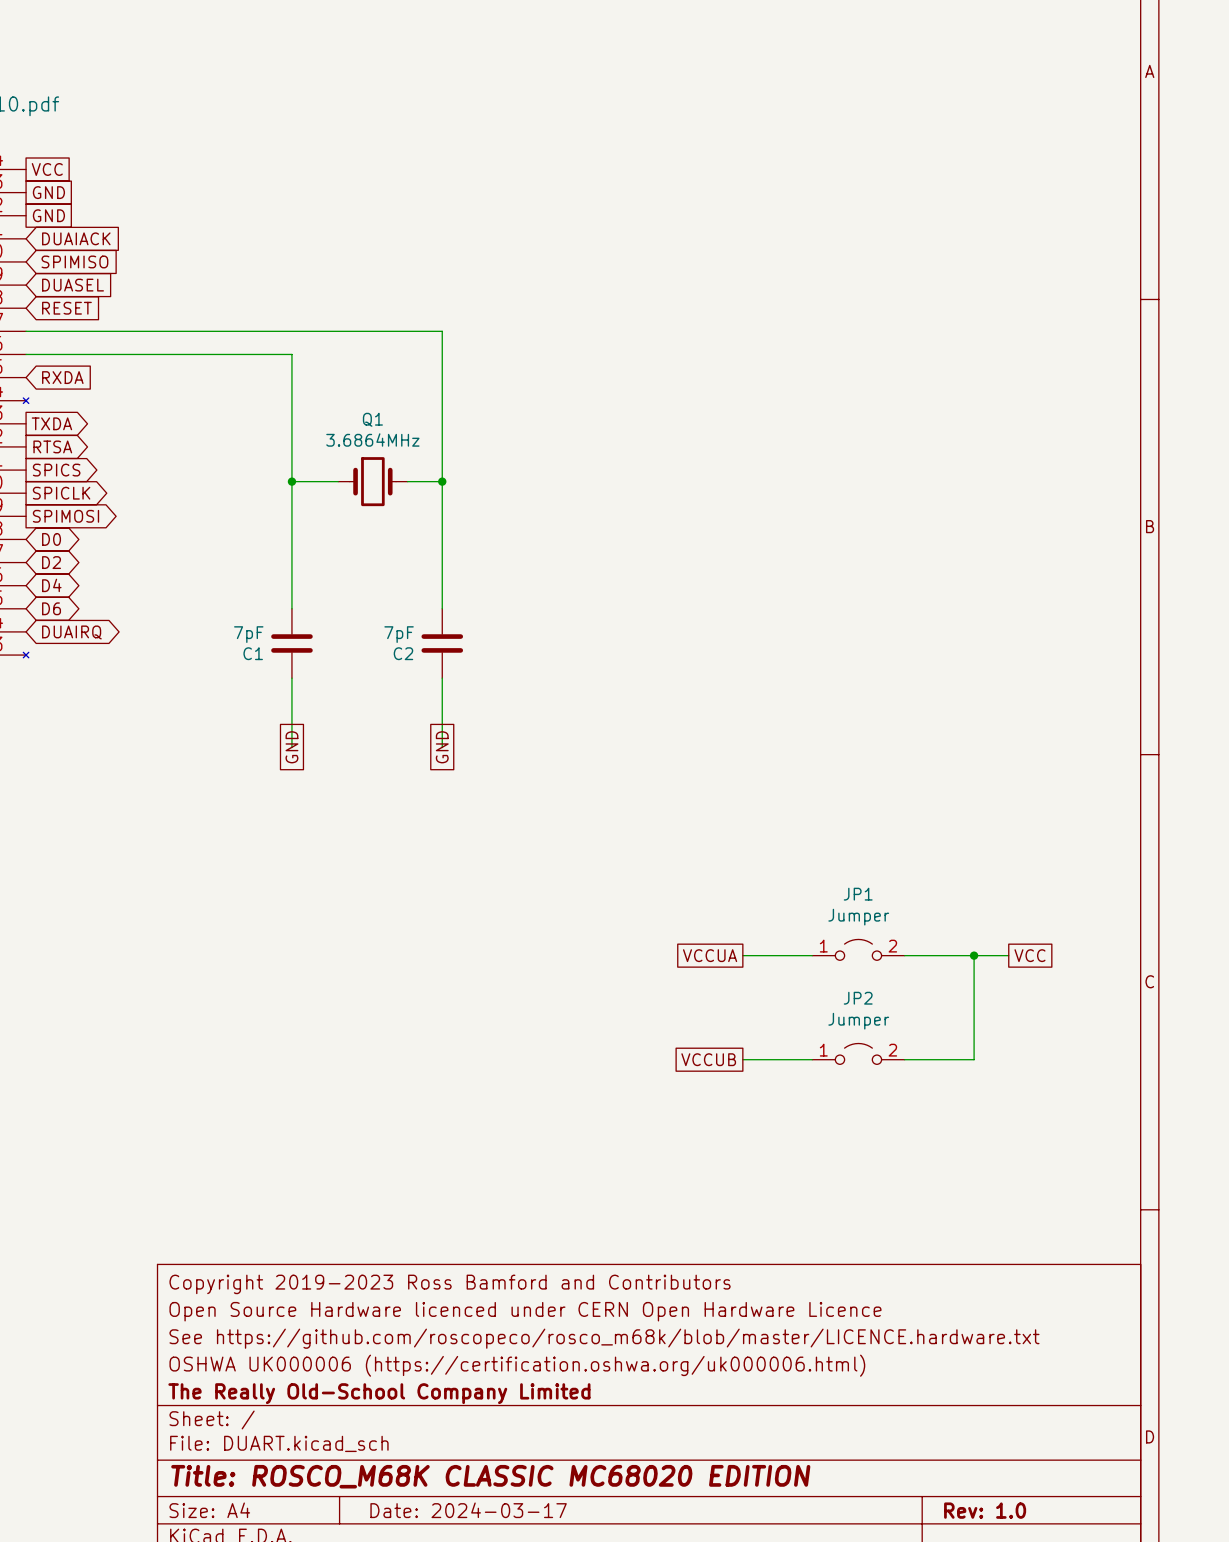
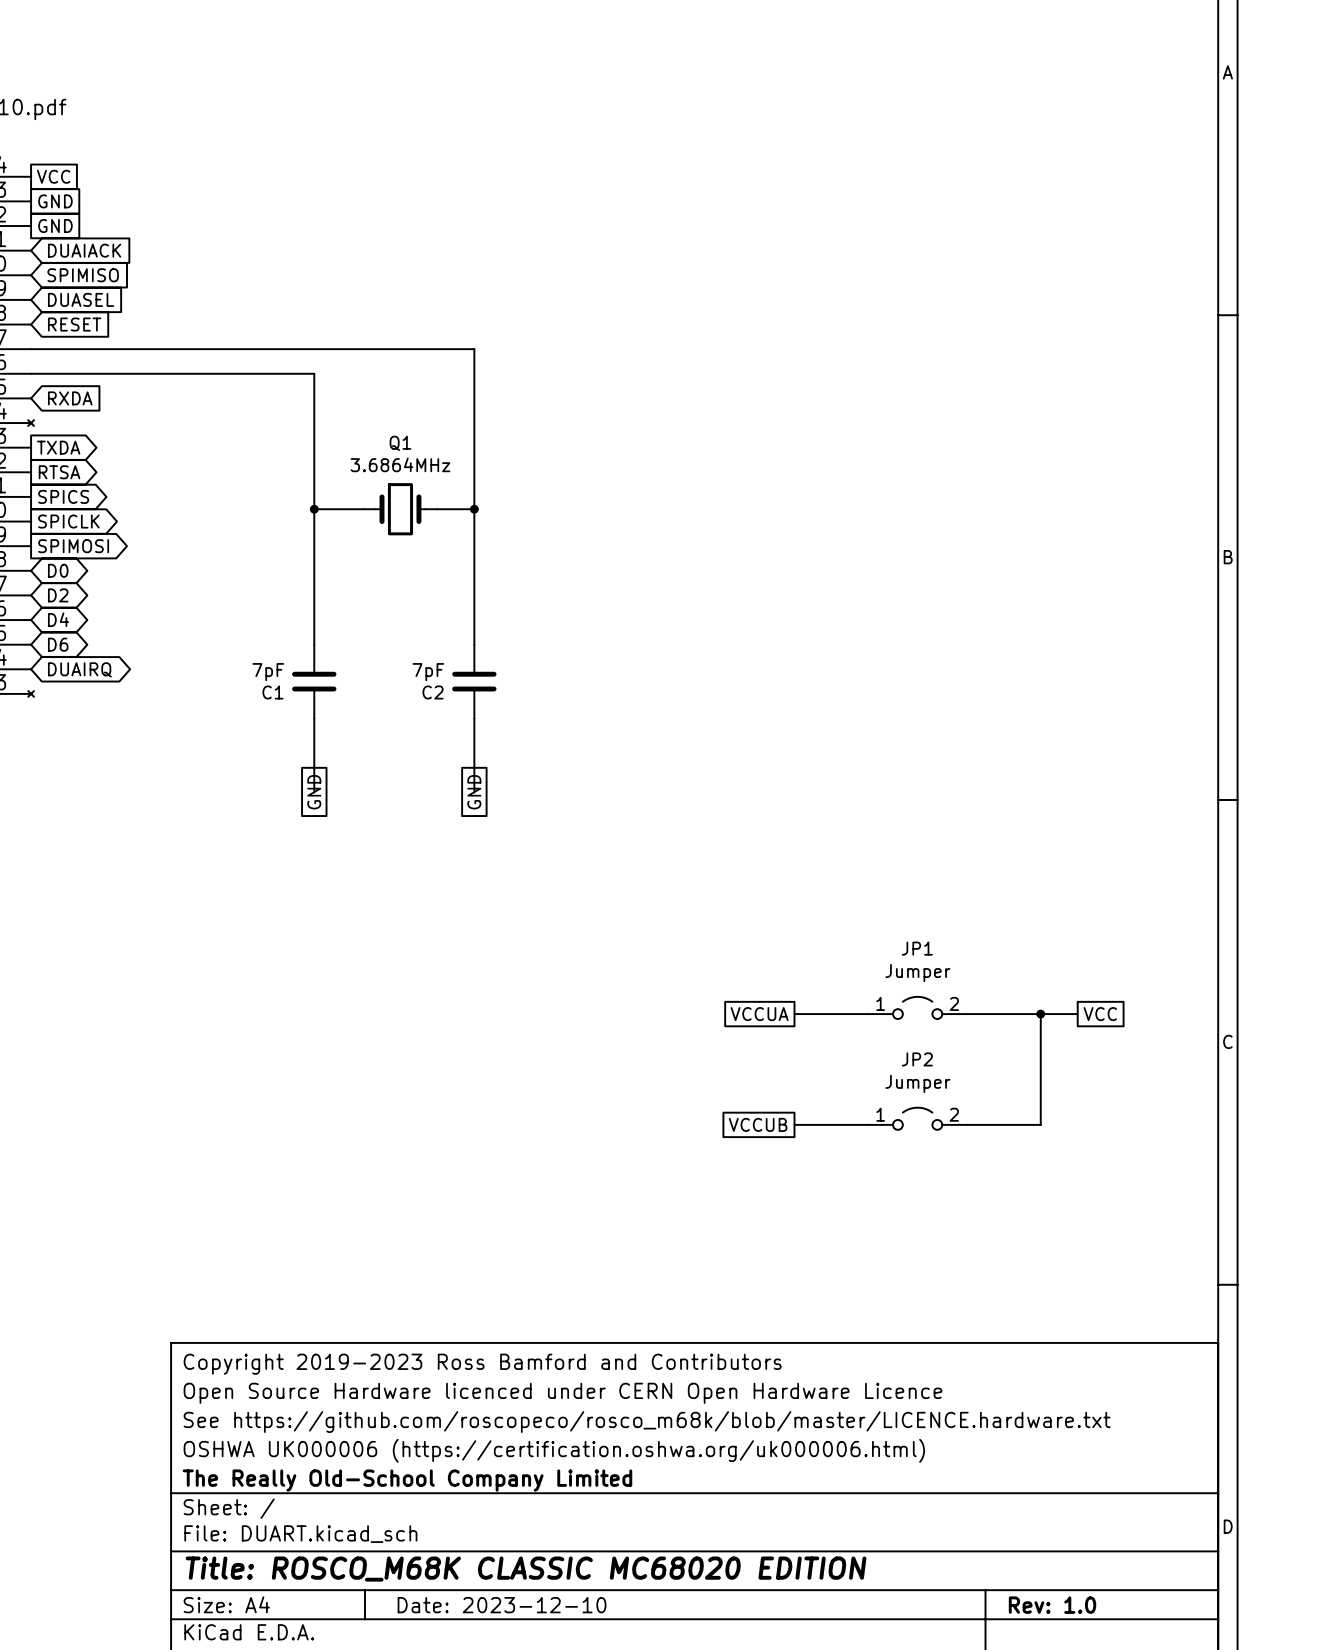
title block: Date: 2024-03-17 (468, 1510) -> Date: 2023-12-10 (502, 1605)

